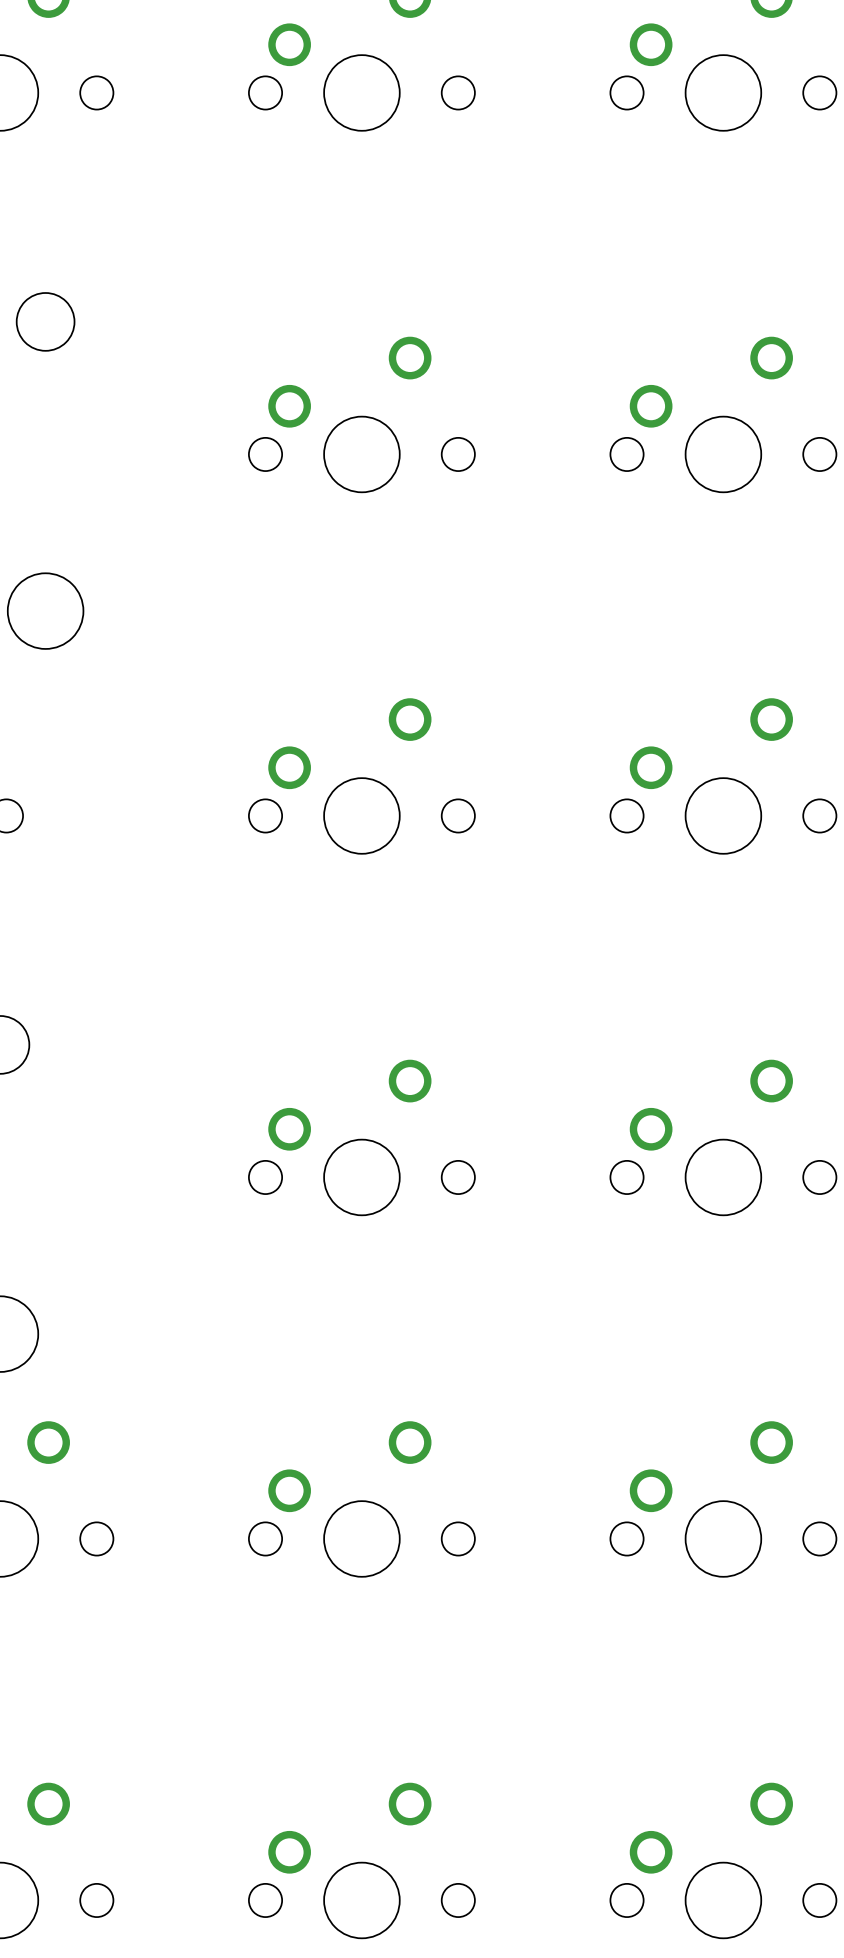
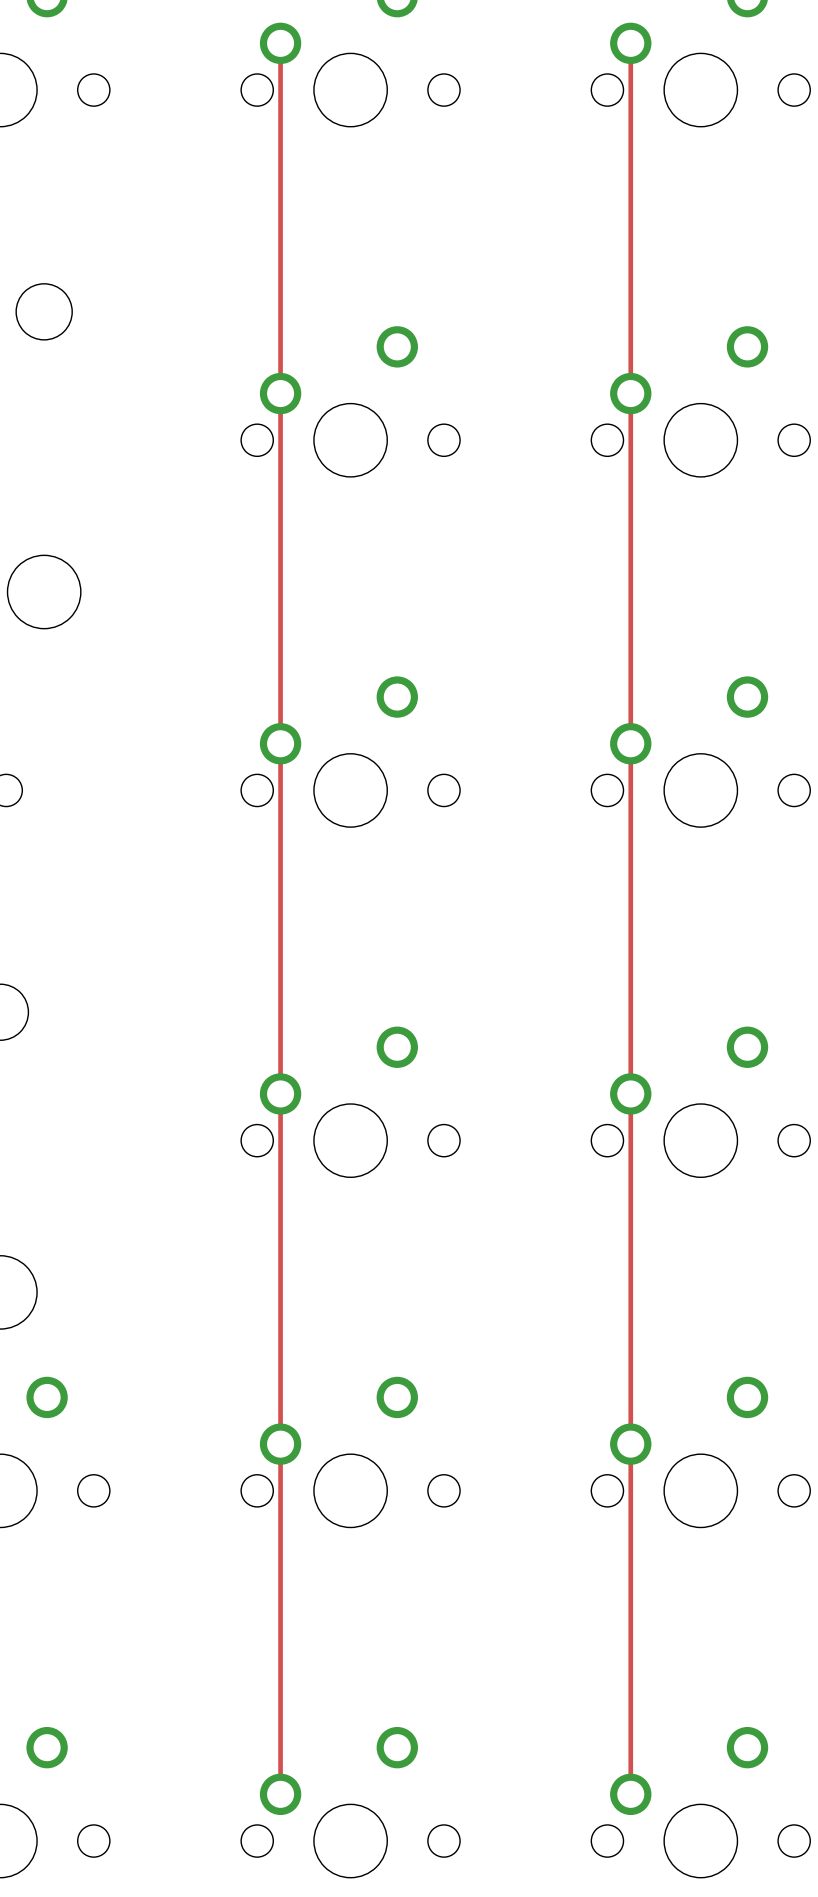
track: none -> (280, 44) (280, 1794)
track: none -> (630, 44) (630, 1794)

